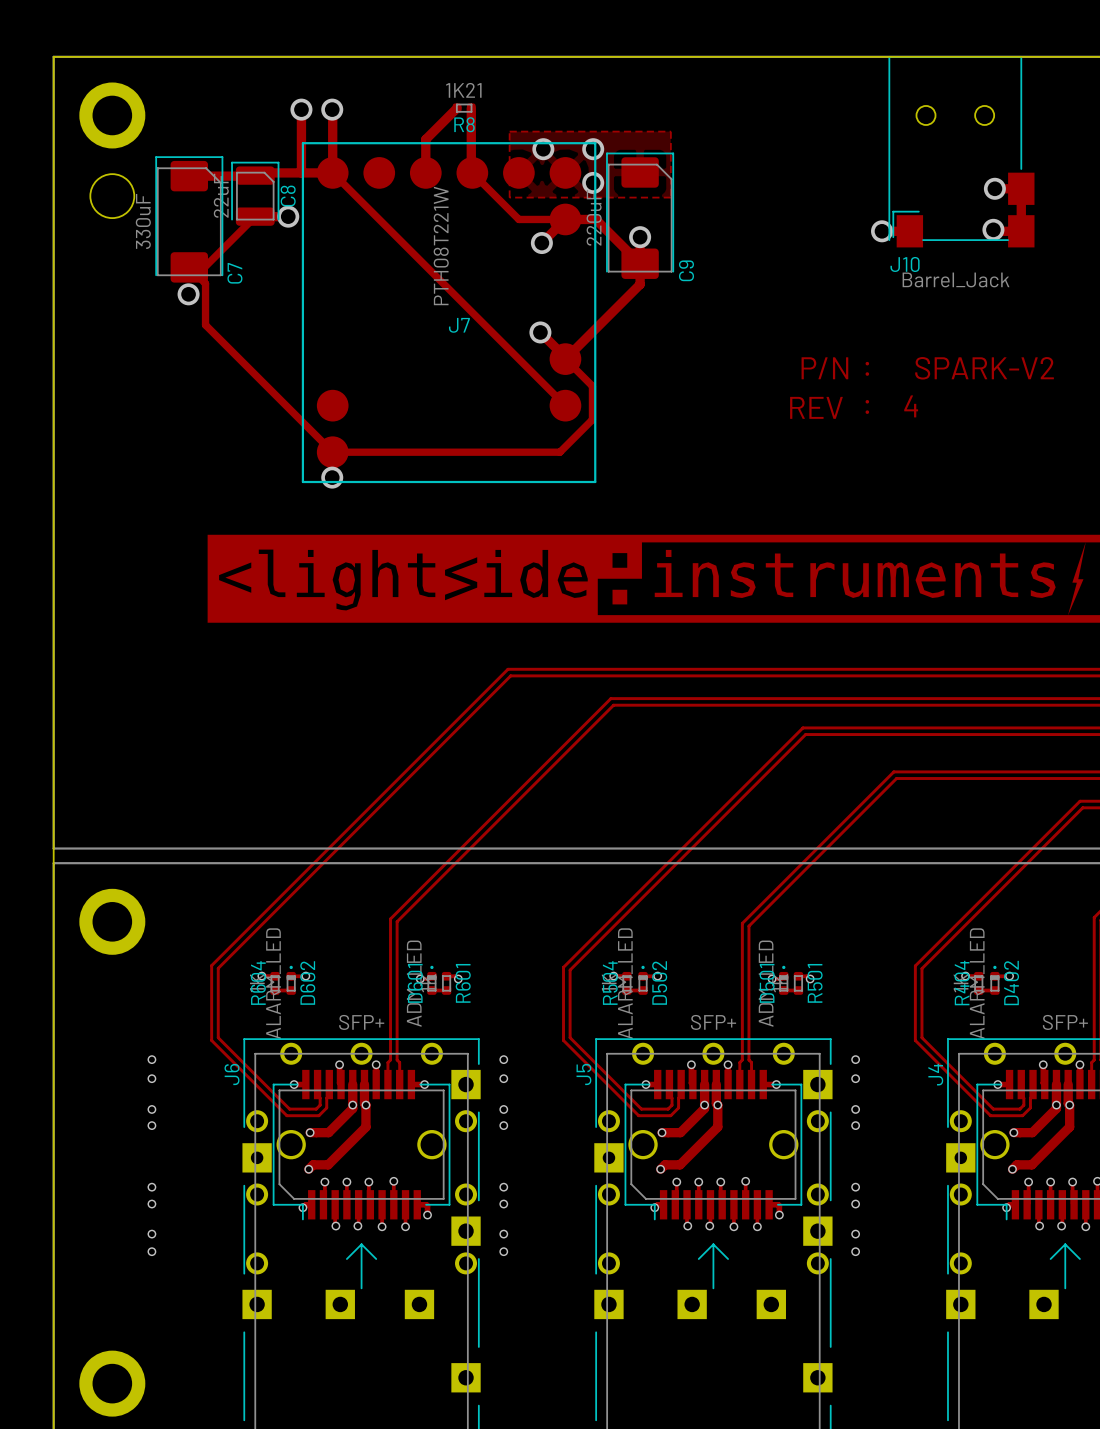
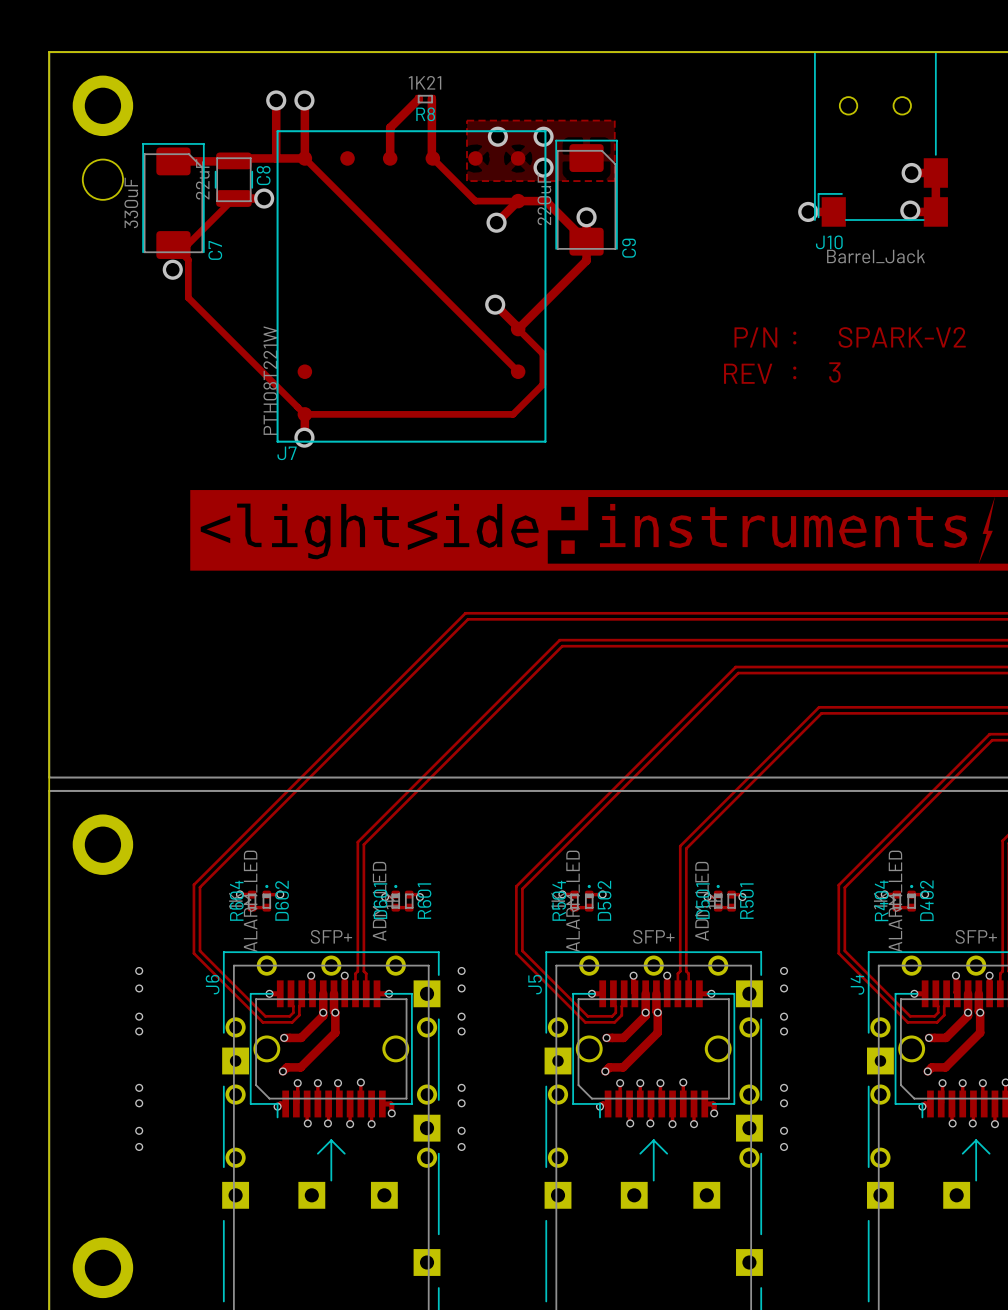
J7 footprint: [301, 142, 597, 484] -> [276, 130, 547, 443]
C8 footprint: [231, 161, 280, 226] -> [214, 152, 253, 207]
J7 value position: PTH08T221W (441, 245) -> PTH08T221W (270, 380)
J7 name position: J7 (459, 325) -> J7 (287, 453)
text: 4 (911, 406) -> 3 (834, 372)

